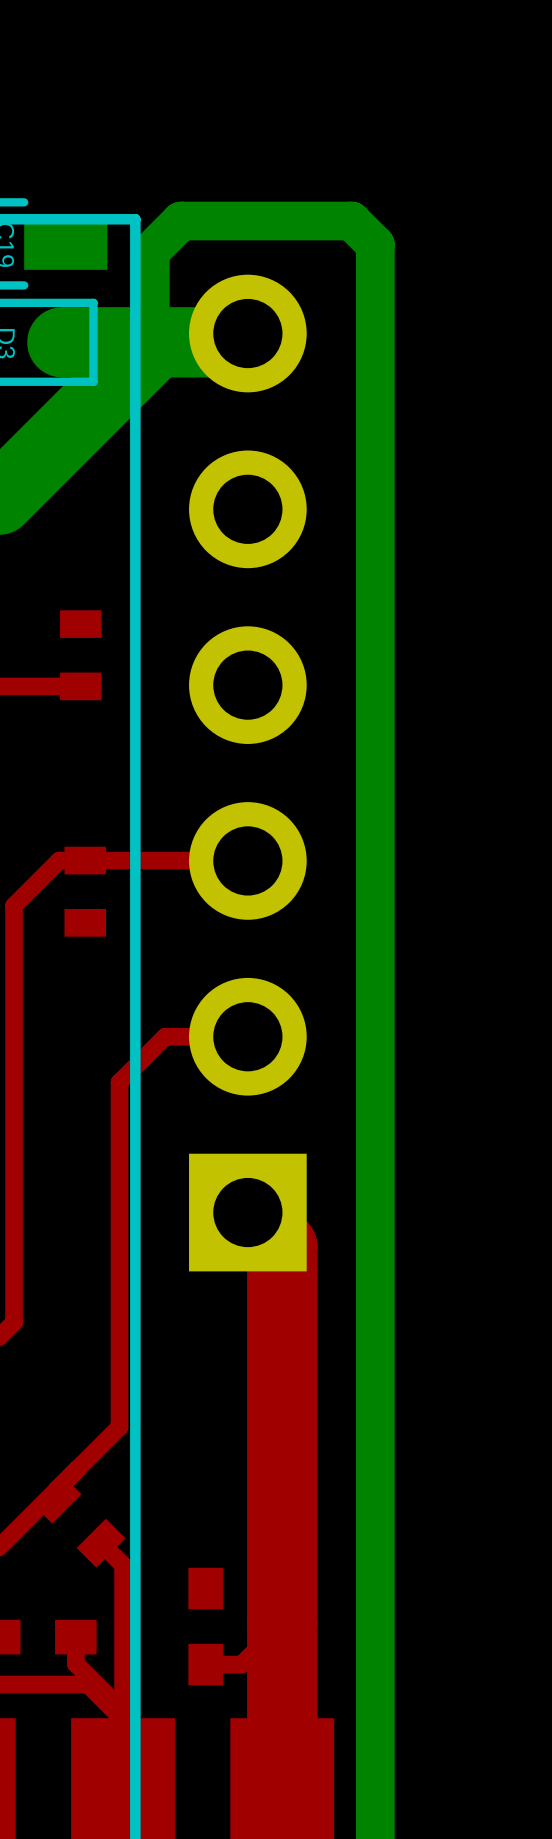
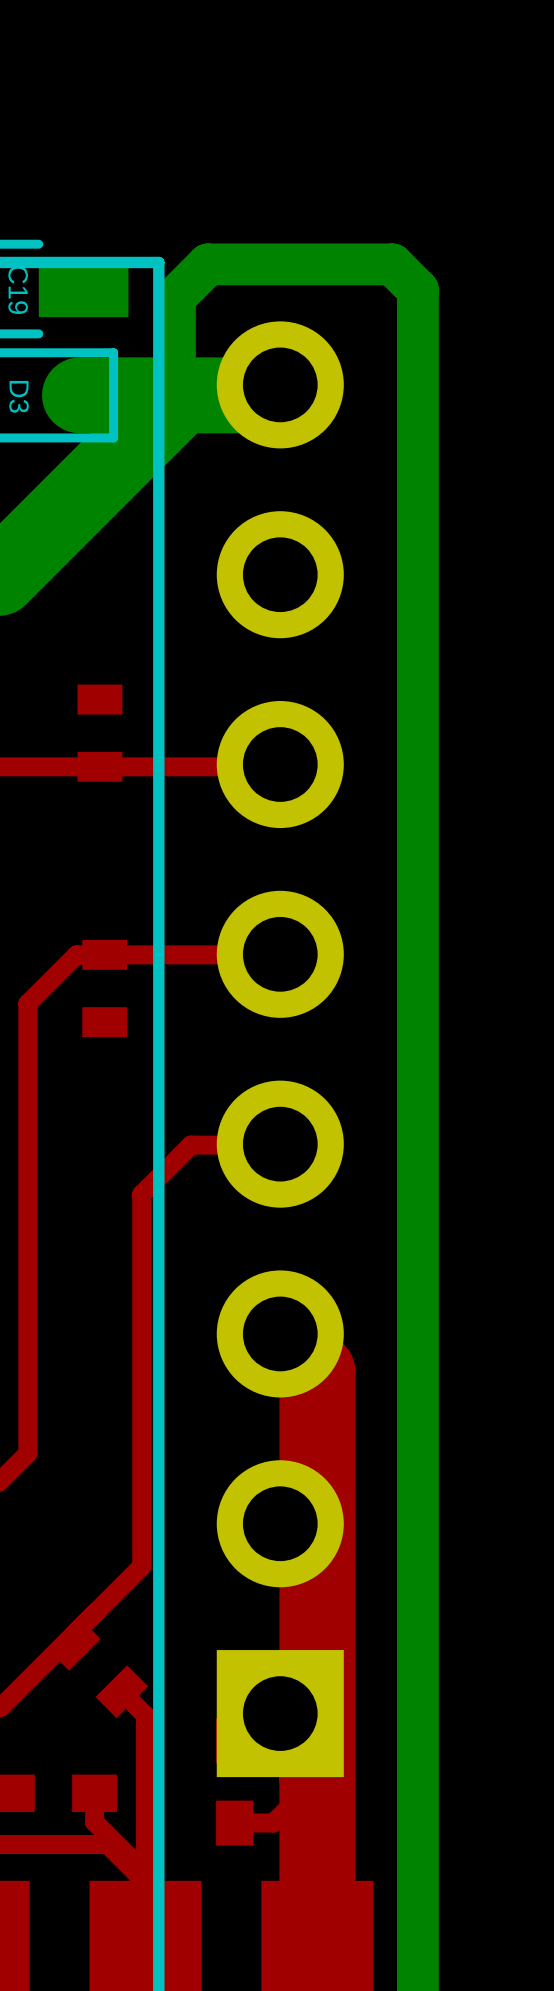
top track: none -> (280, 765) (99, 766)
part: (247, 773) -> none
part: none -> (280, 1049)

